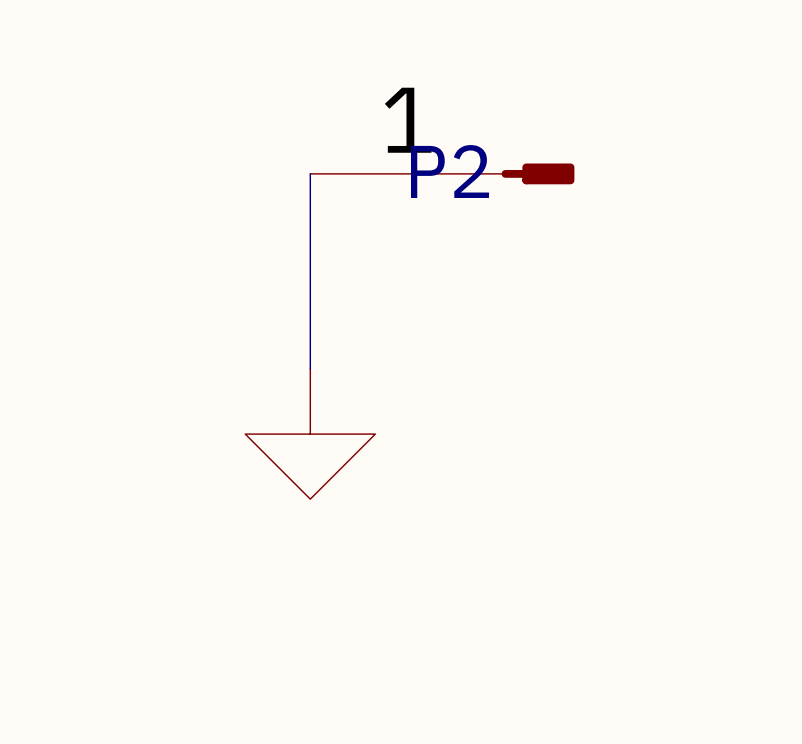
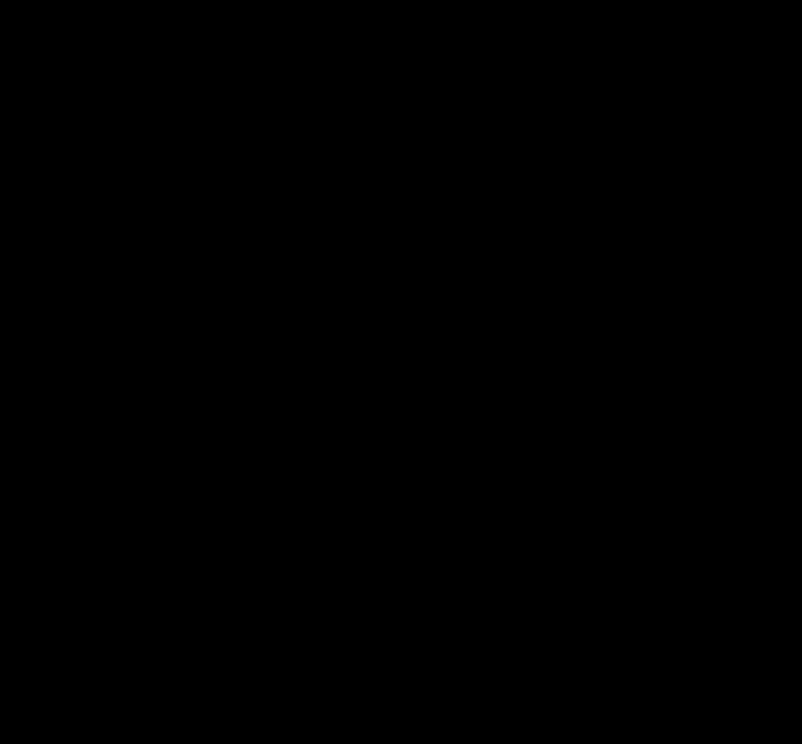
wire: (310, 173) (310, 369) -> none
P2: (442, 173) -> none
power symbol: (310, 434) -> none

